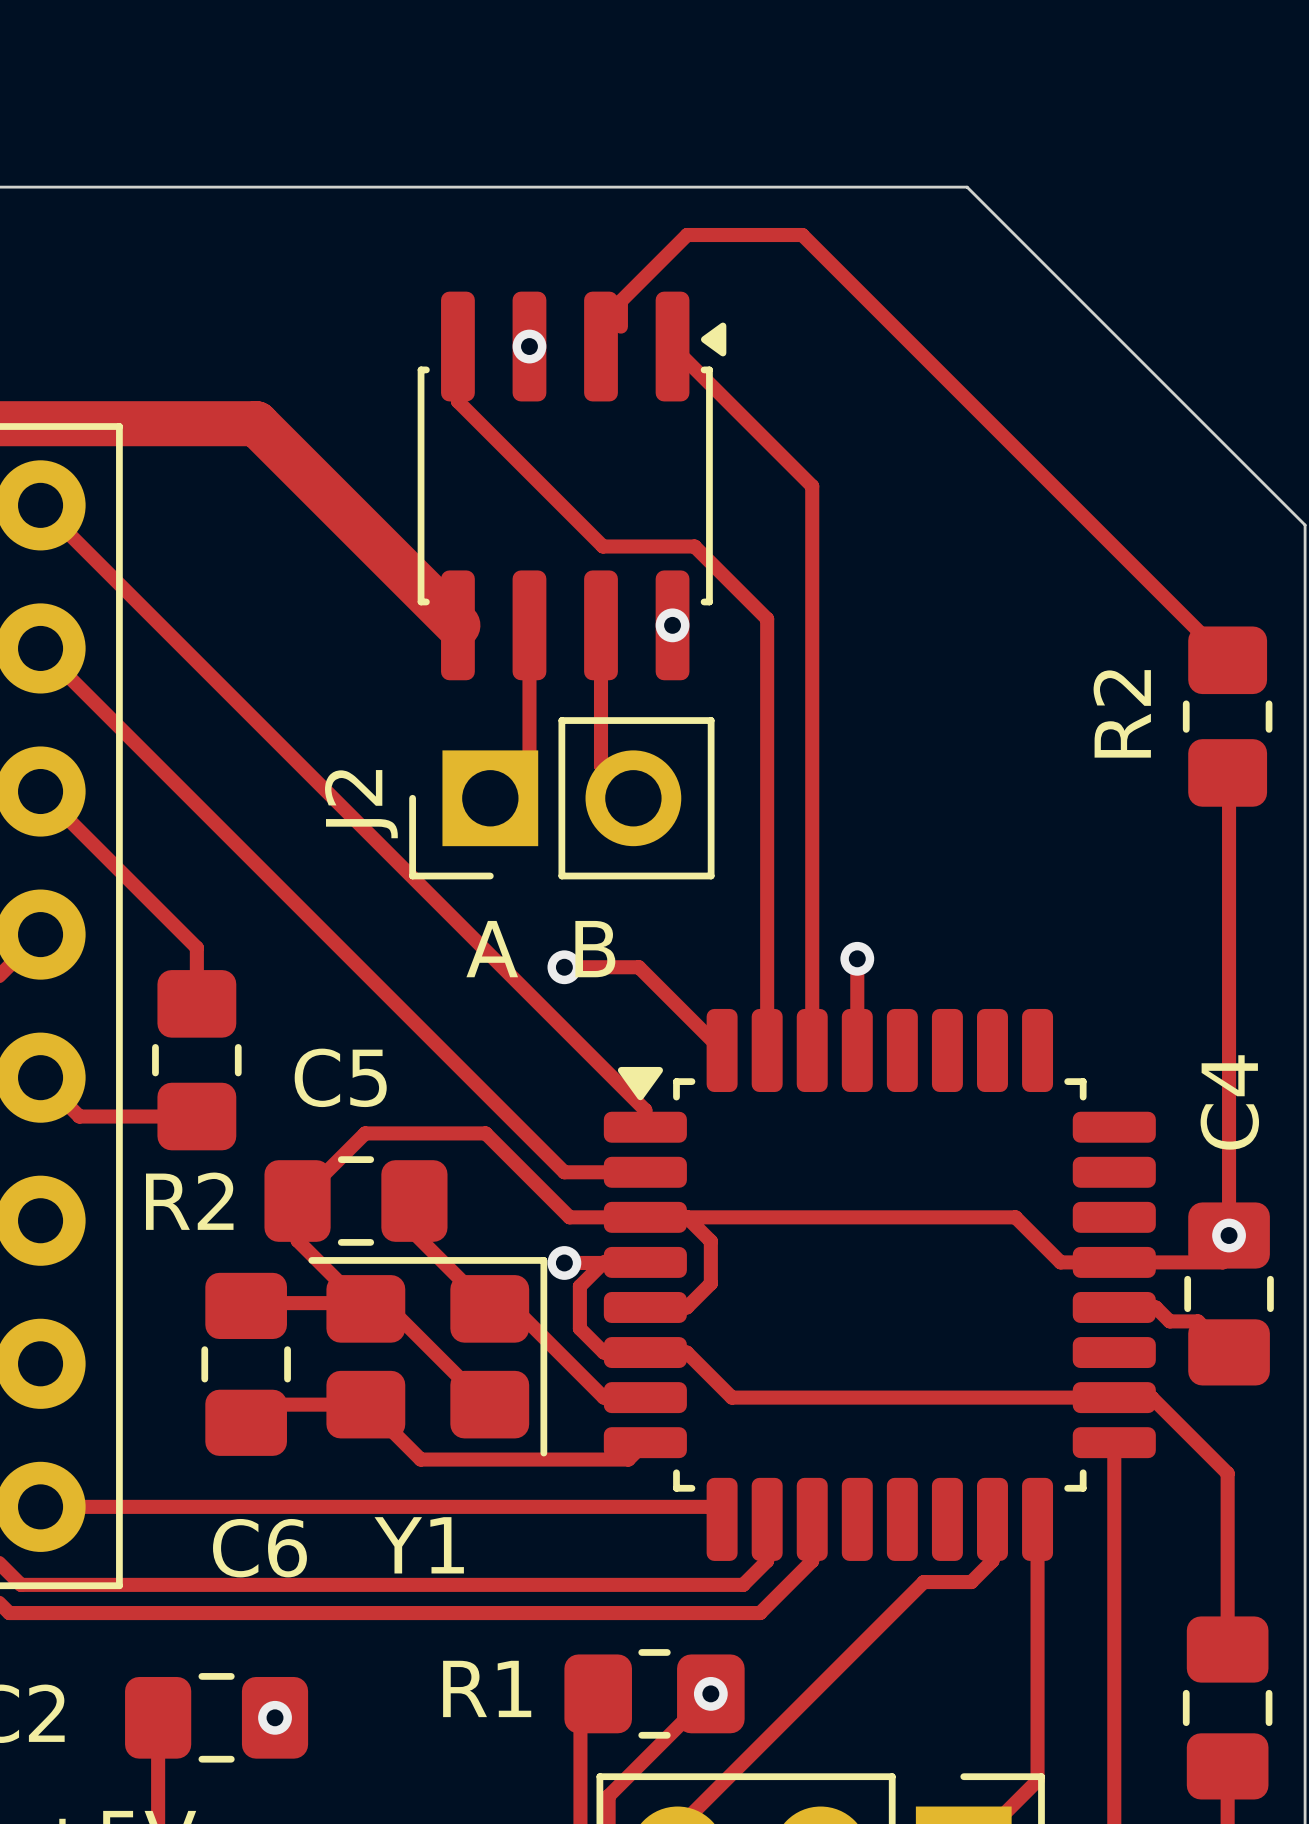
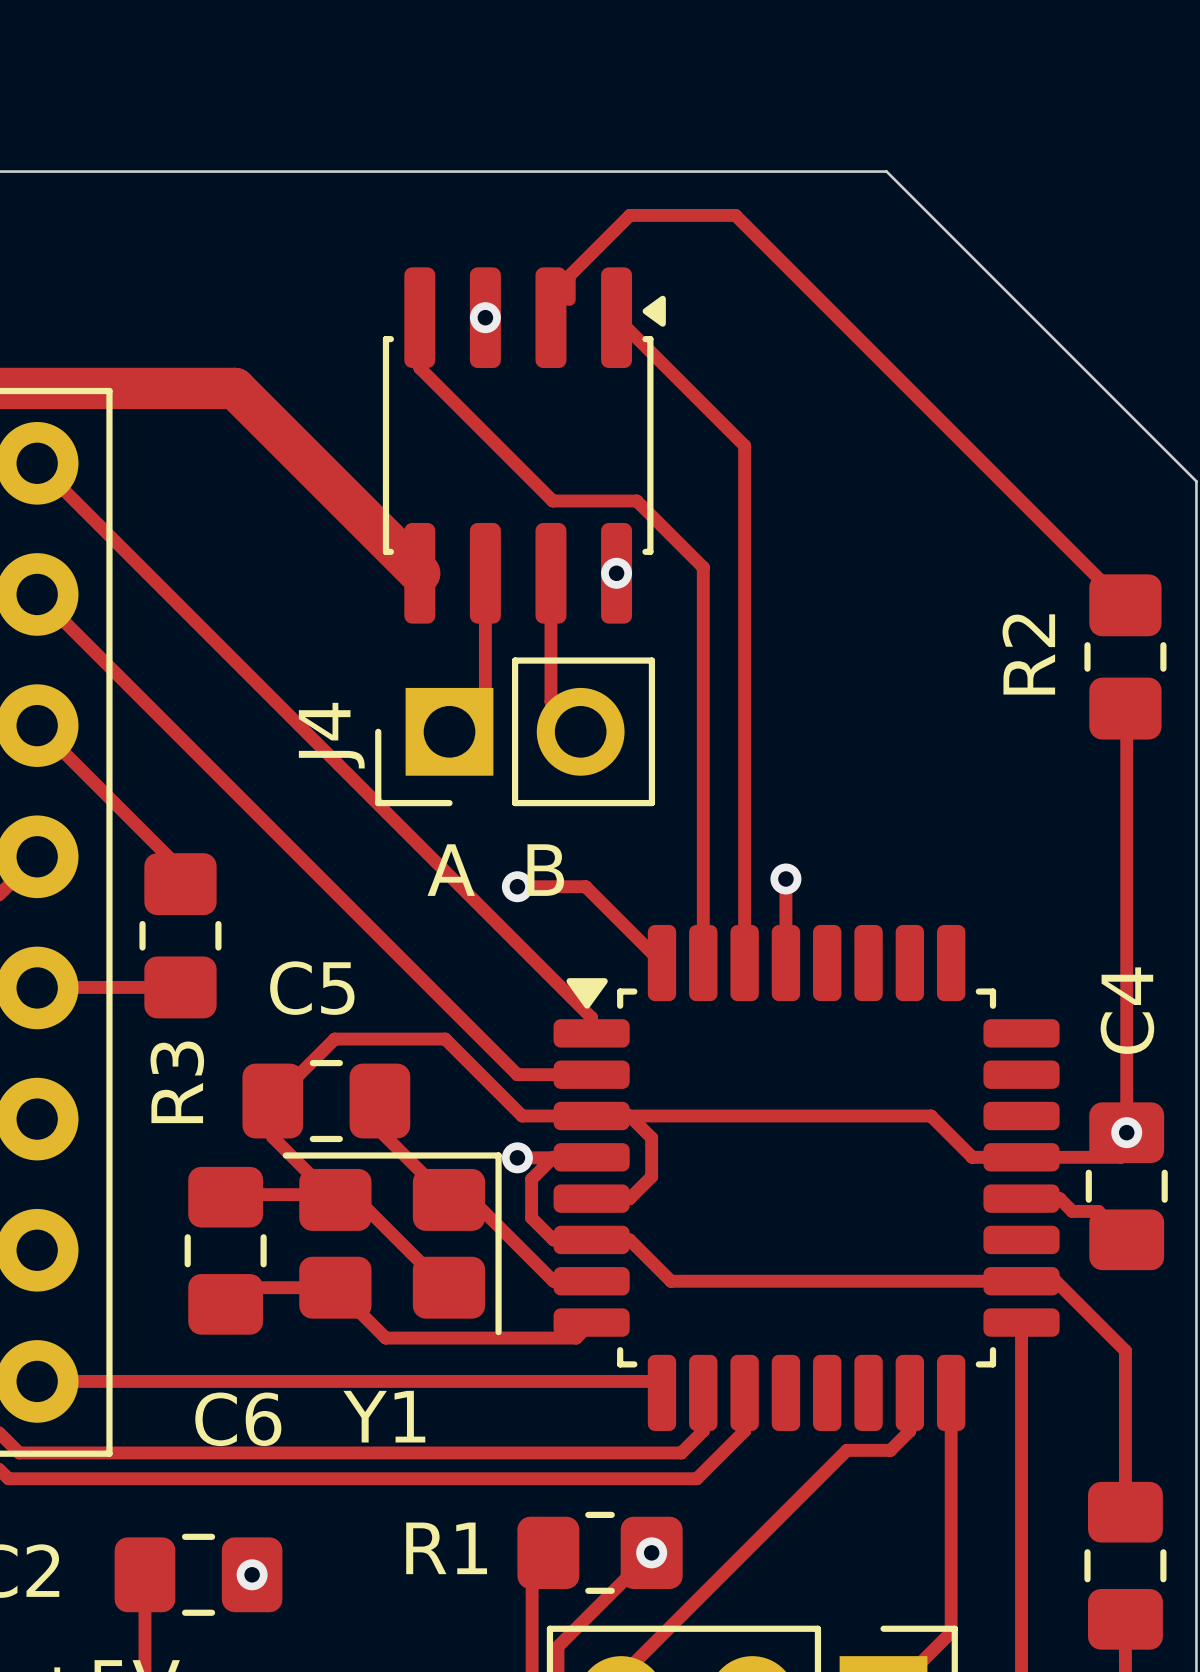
J2 name: J2 (361, 804) -> J4 (331, 735)
R2 position: (196, 1060) -> (180, 935)
track: (40, 1077) (79, 1116) (196, 1116) -> (37, 987) (180, 987)
R2 name: R2 (189, 1201) -> R3 (177, 1082)

